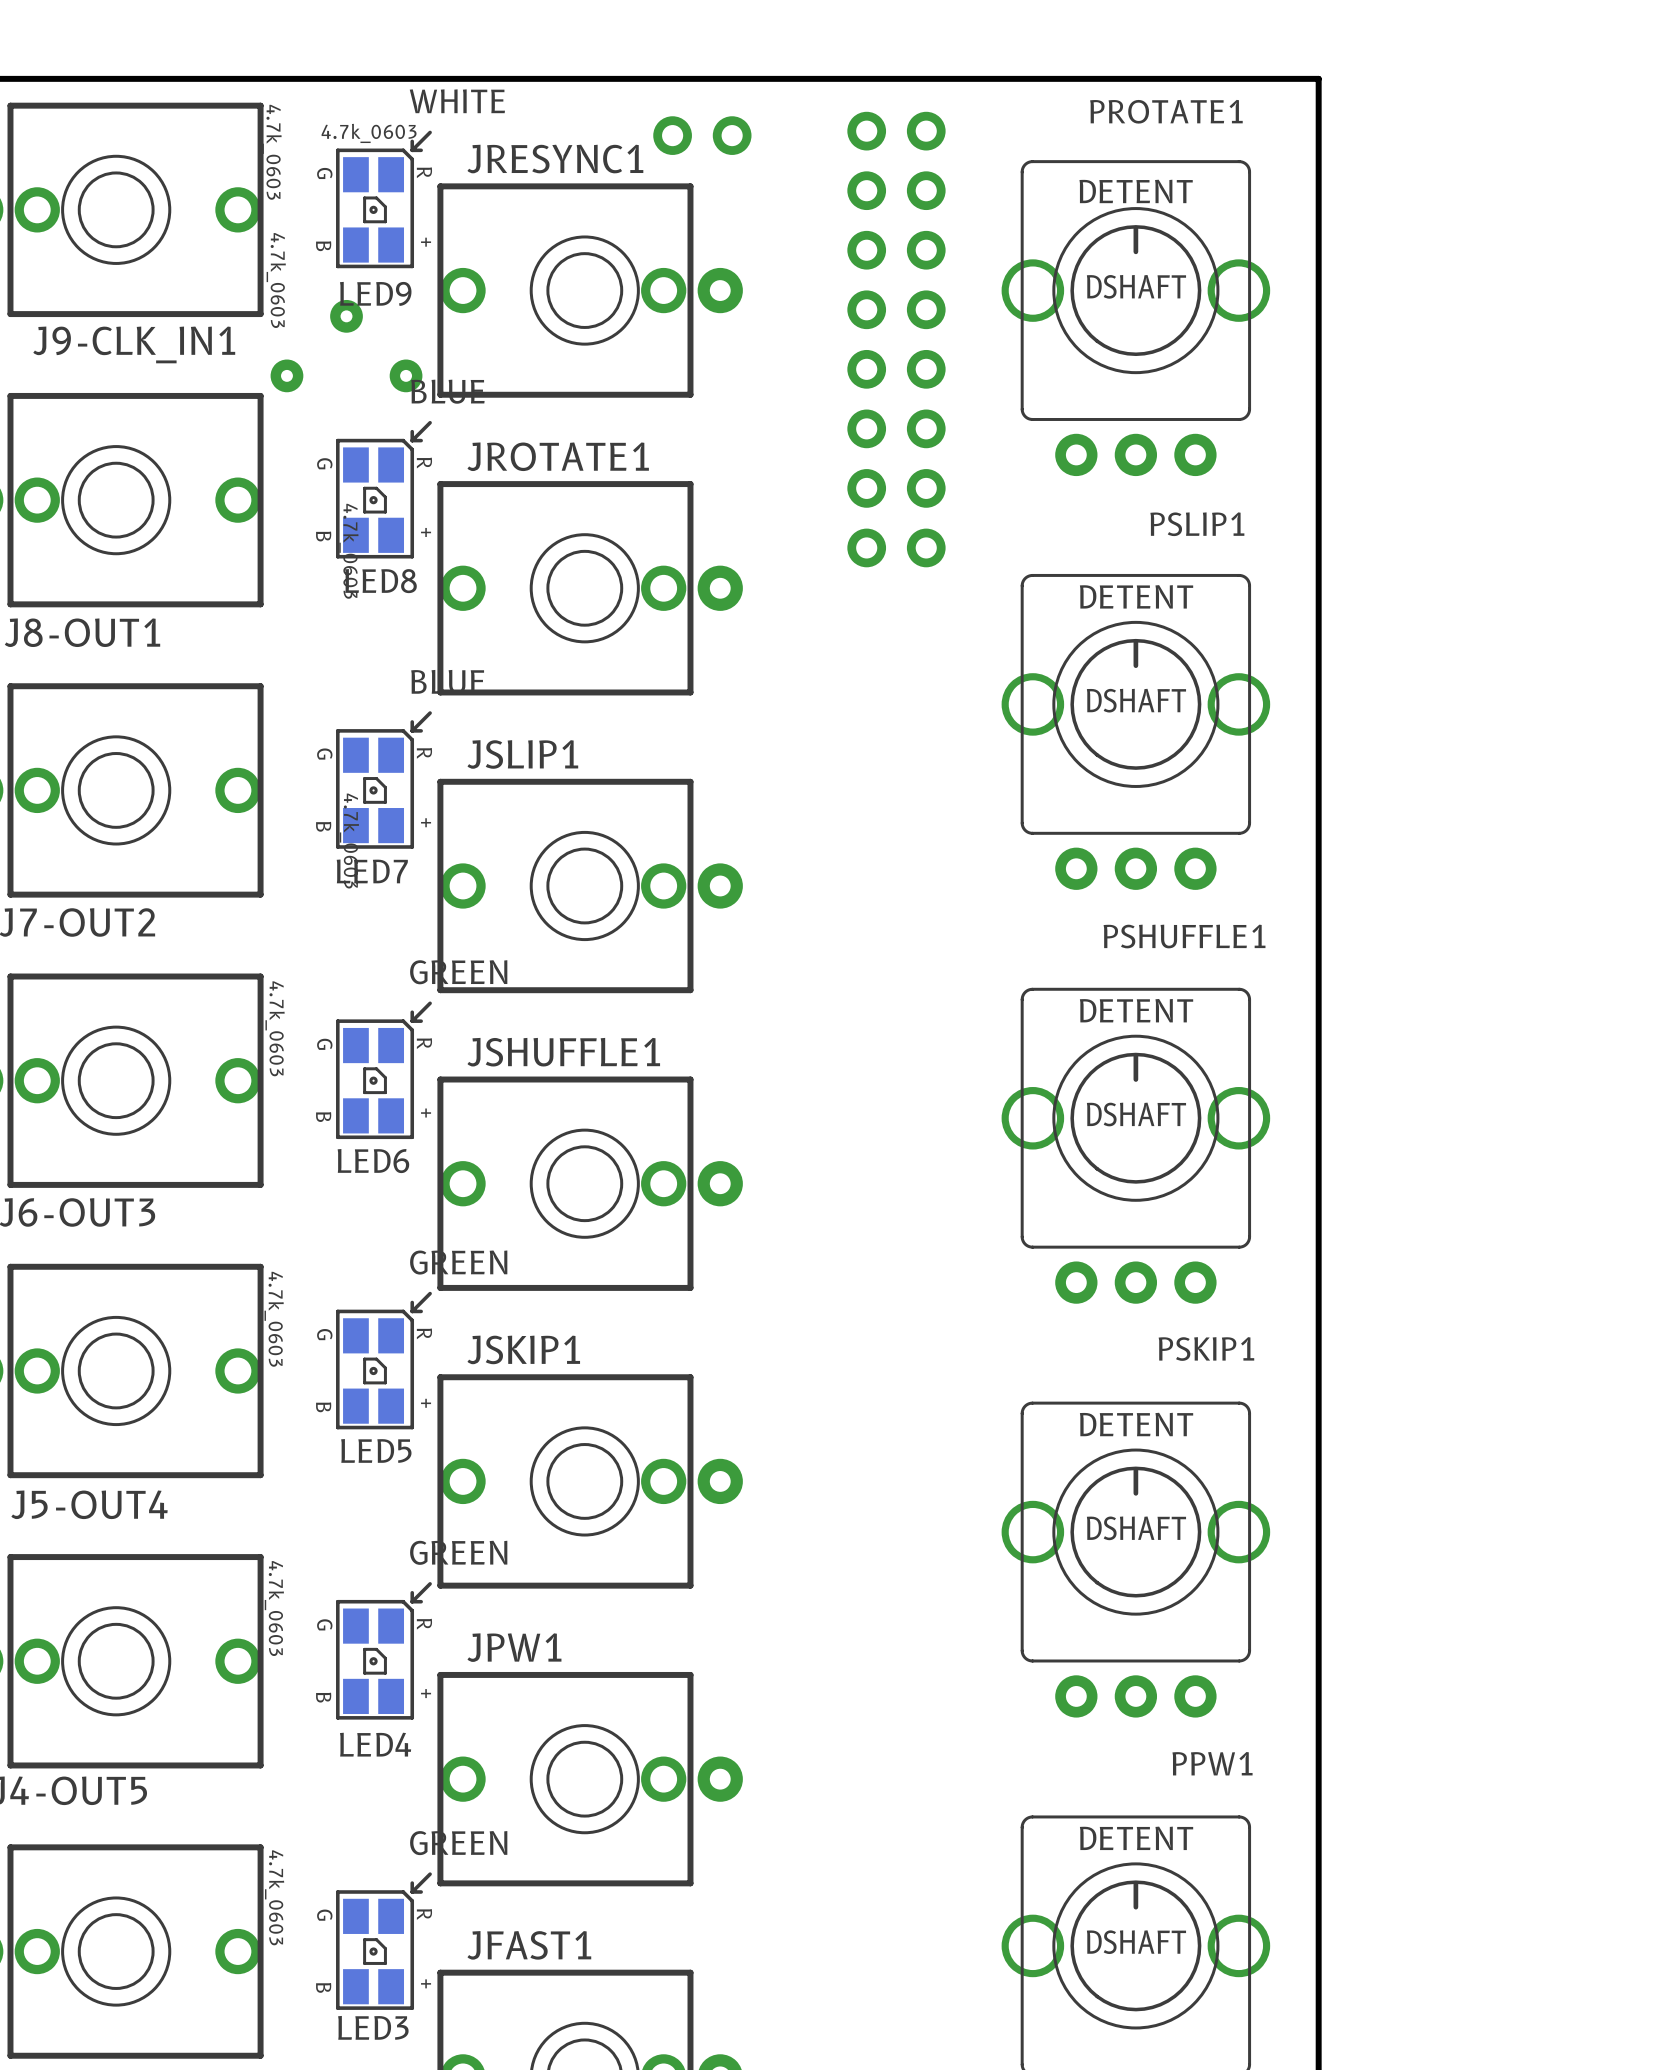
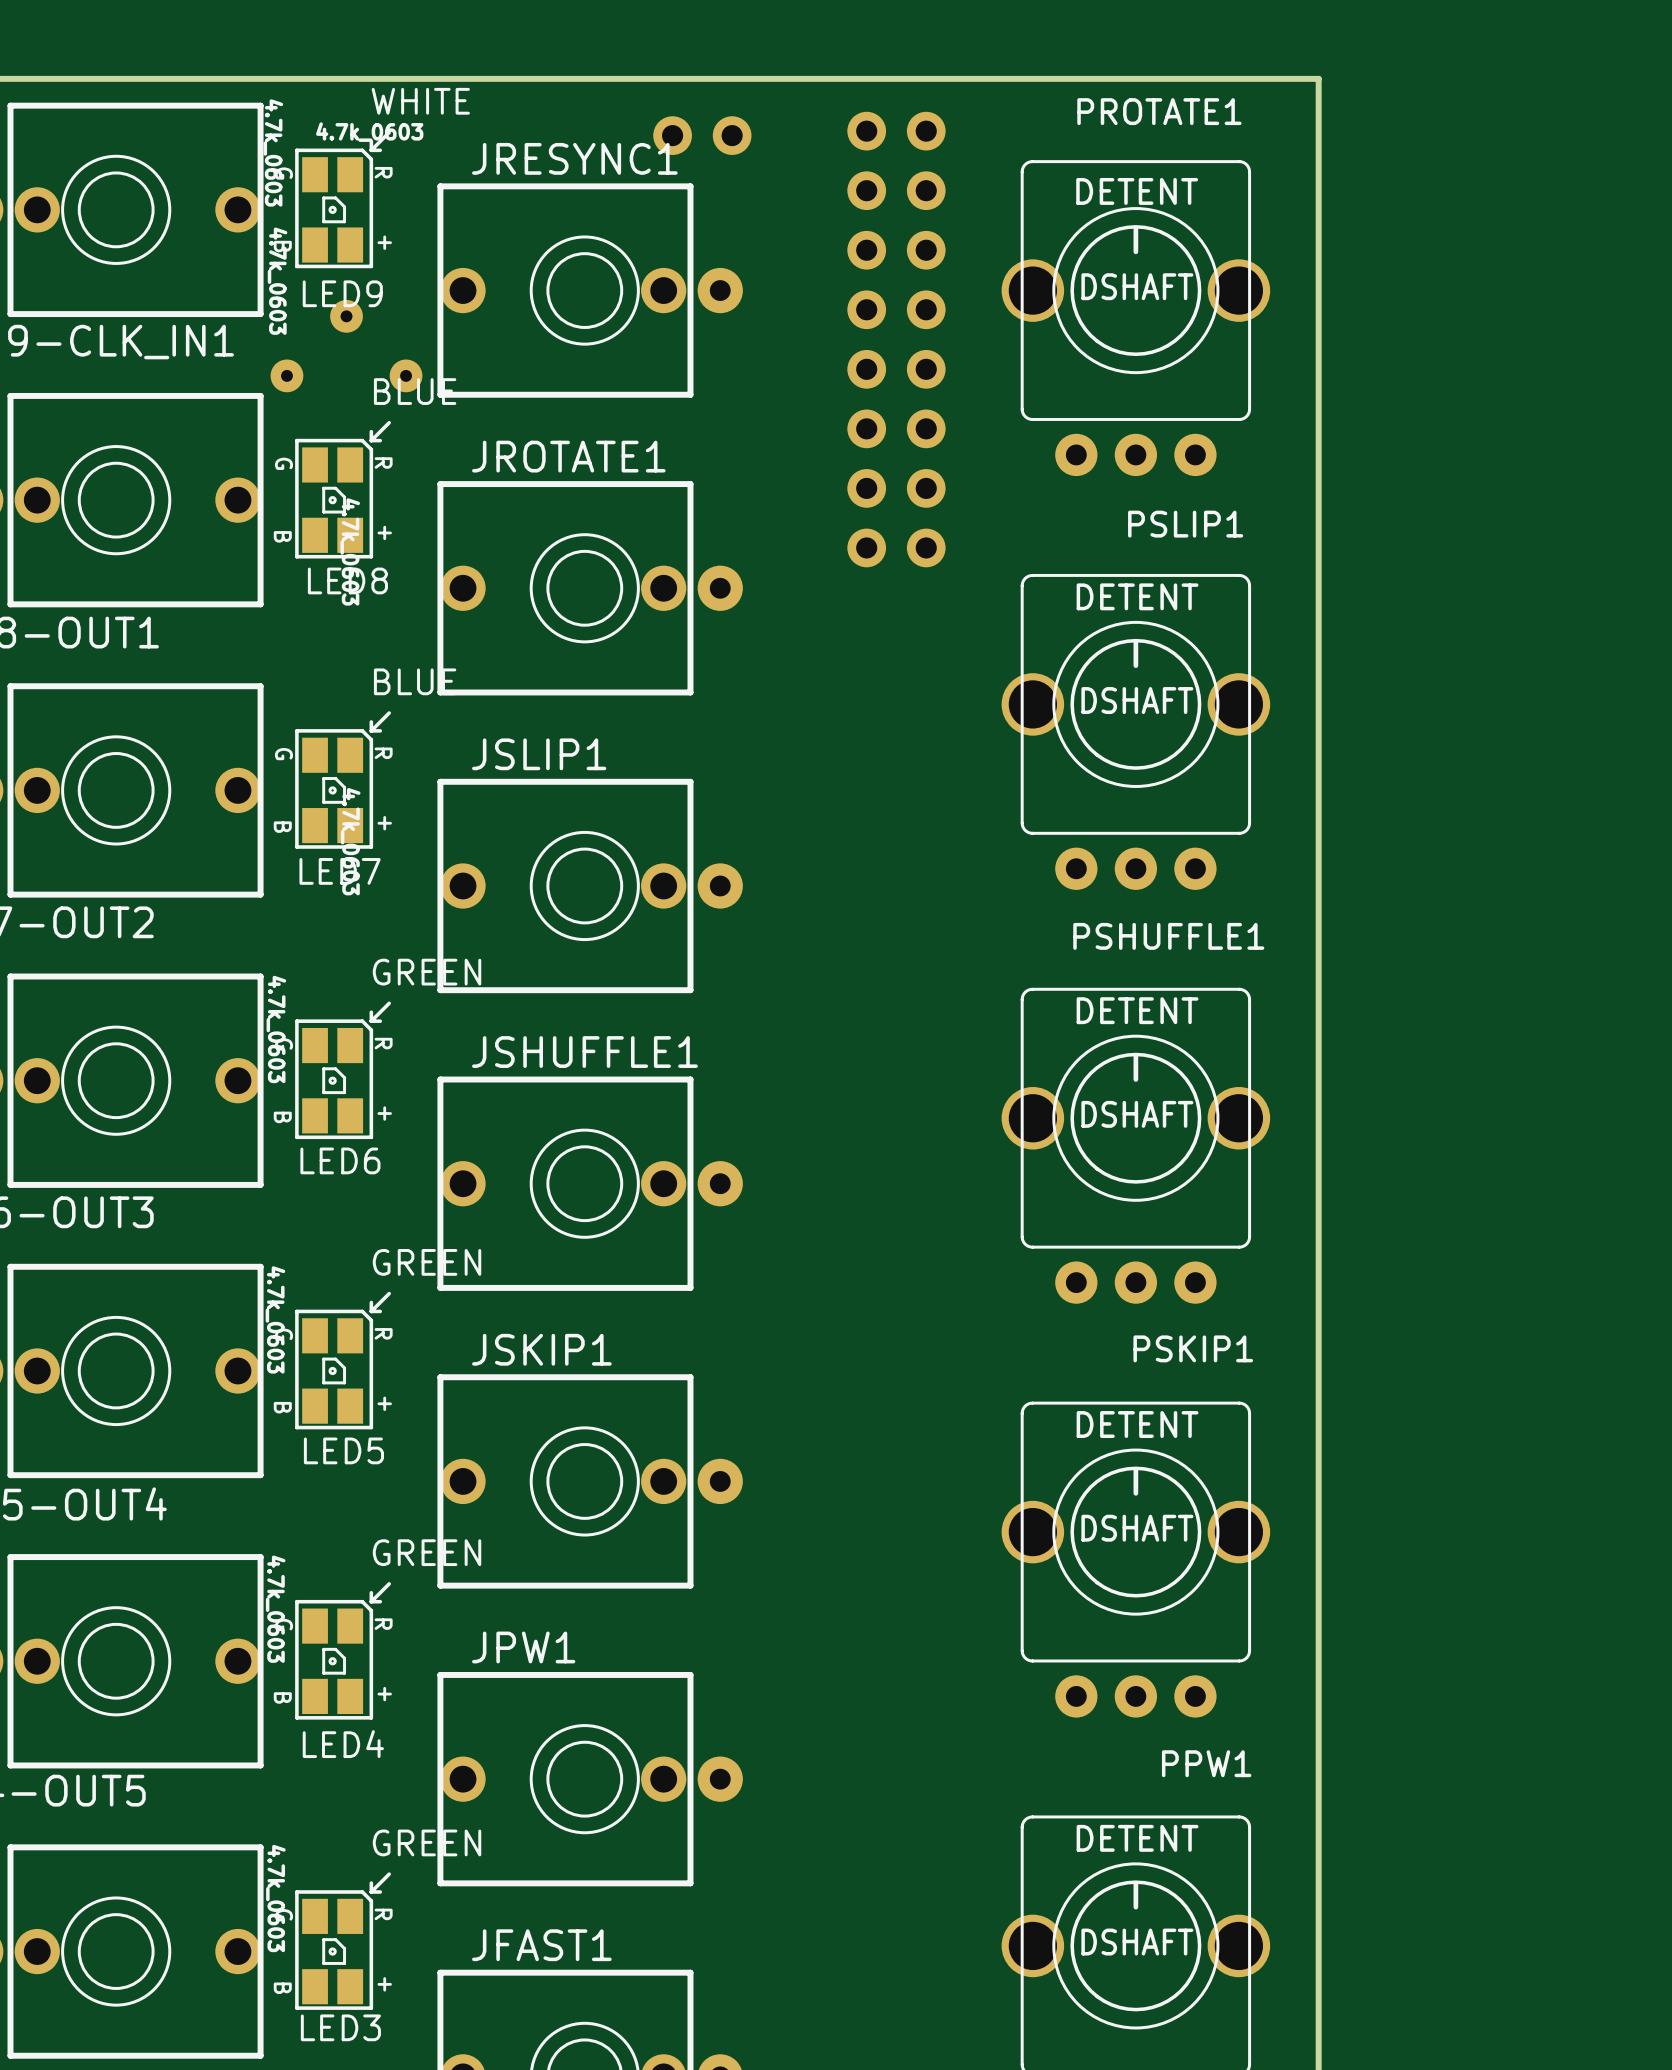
LED9 position: (383, 199) -> (343, 199)
LED8 position: (383, 489) -> (343, 489)
LED7 position: (383, 780) -> (343, 780)
LED6 position: (383, 1070) -> (343, 1070)
LED5 position: (383, 1360) -> (343, 1360)
LED4 position: (383, 1650) -> (343, 1650)
LED3 position: (383, 1941) -> (343, 1941)

